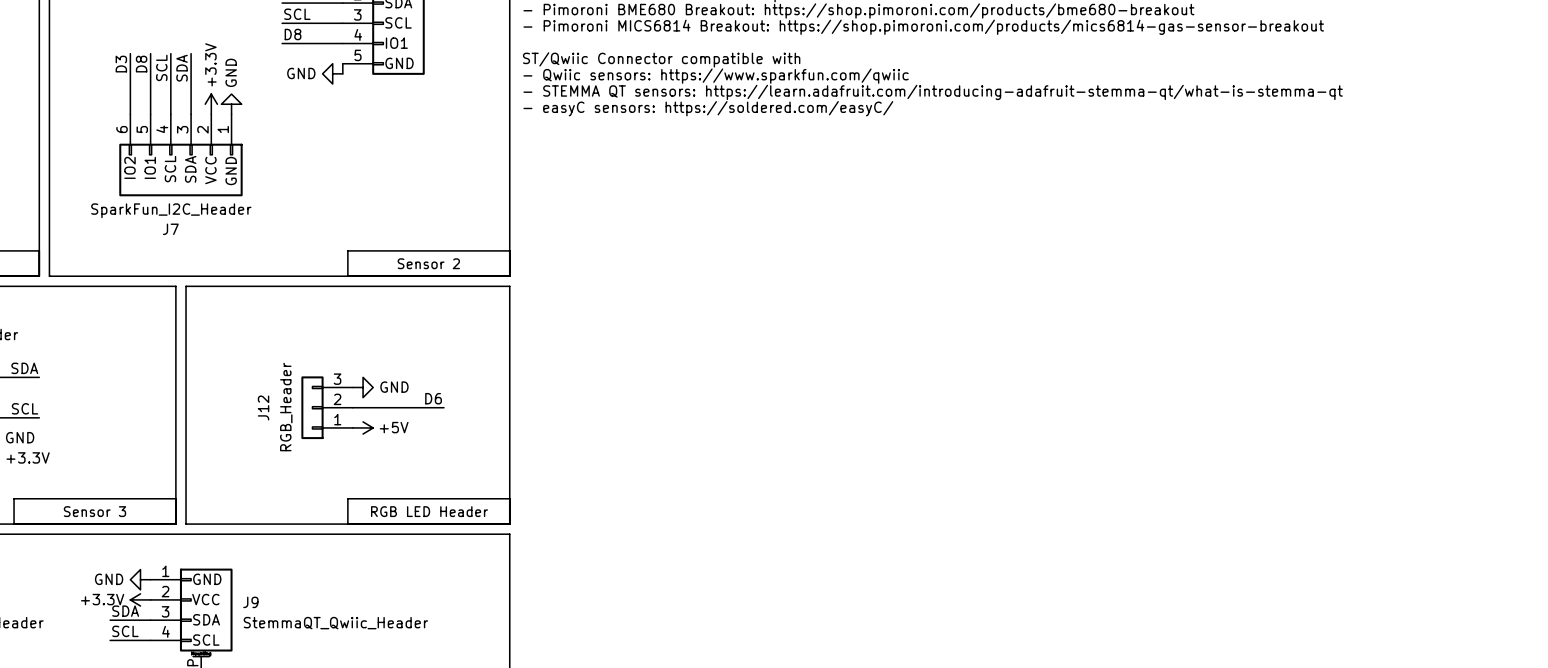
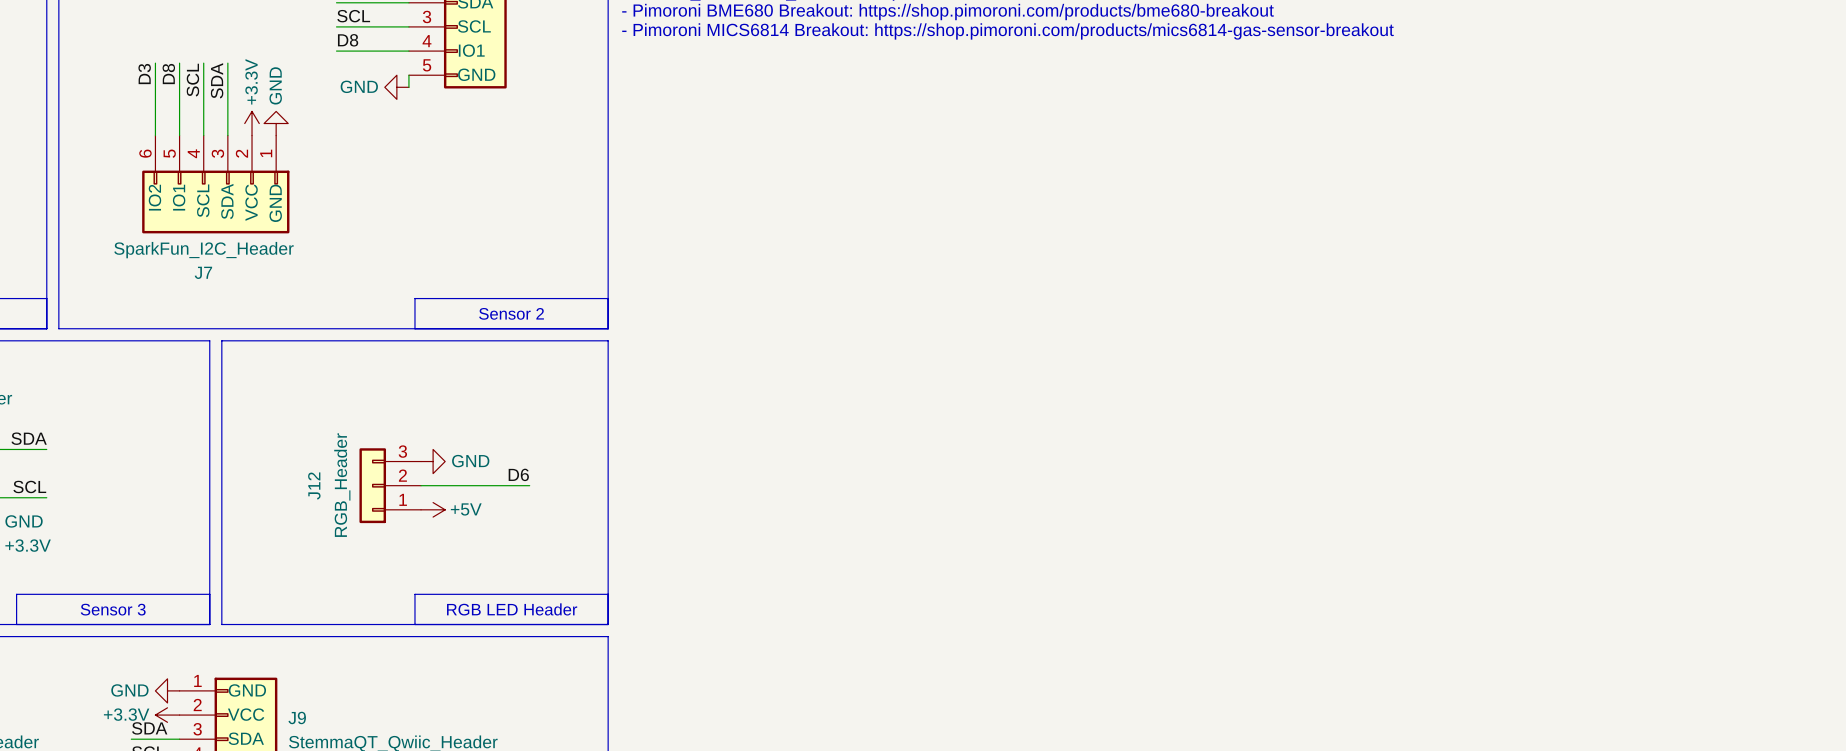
text: ST/Qwiic Connector compatible with (661, 59) -> none
text: - Qwiic sensors: https://www.sparkfun.com/qwiic (716, 76) -> none
text: - STEMMA QT sensors: https://learn.adafruit.com/introducing-adafruit-stemma-qt/what-is-stemma-qt (933, 92) -> none
text: - easyC sensors: https://soldered.com/easyC/ (708, 108) -> none

